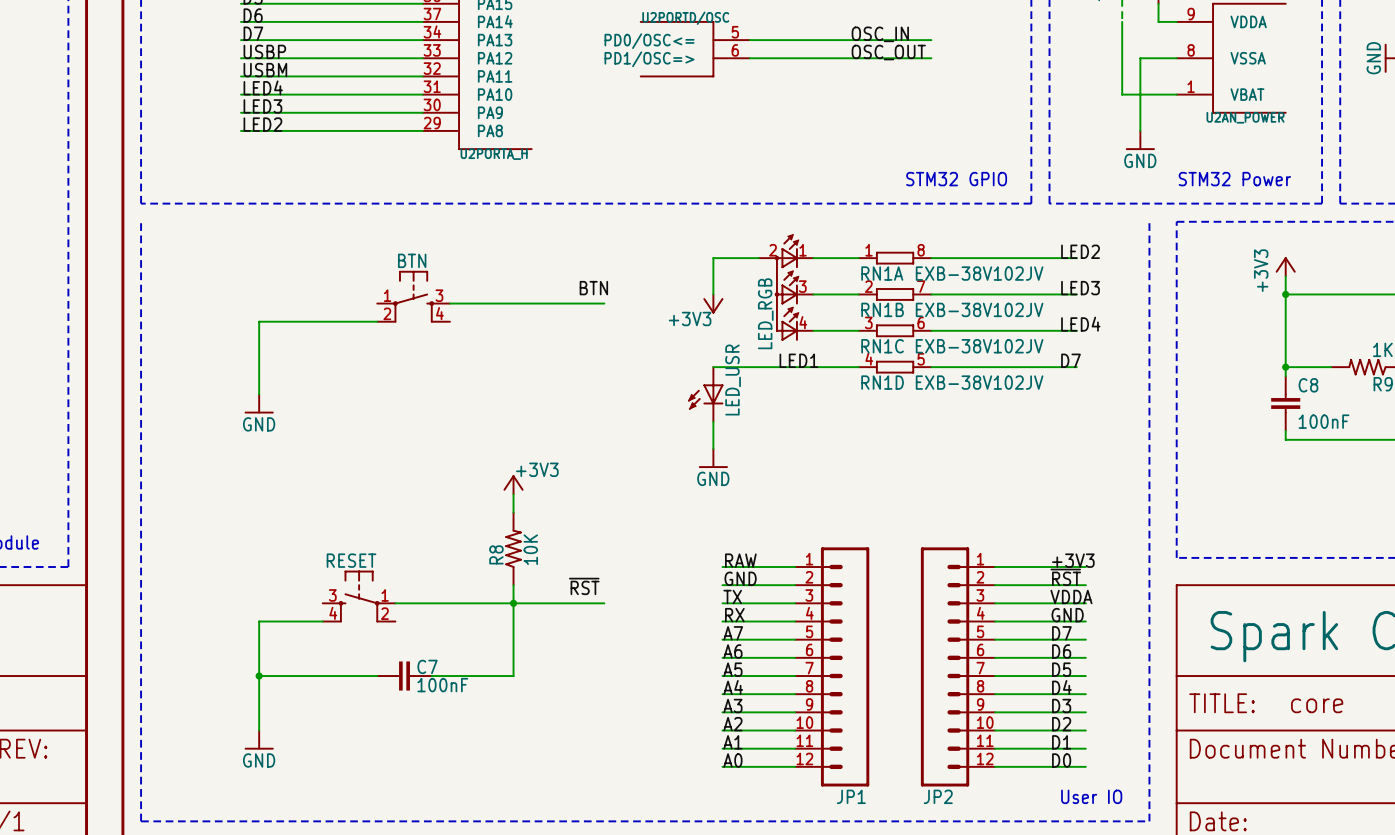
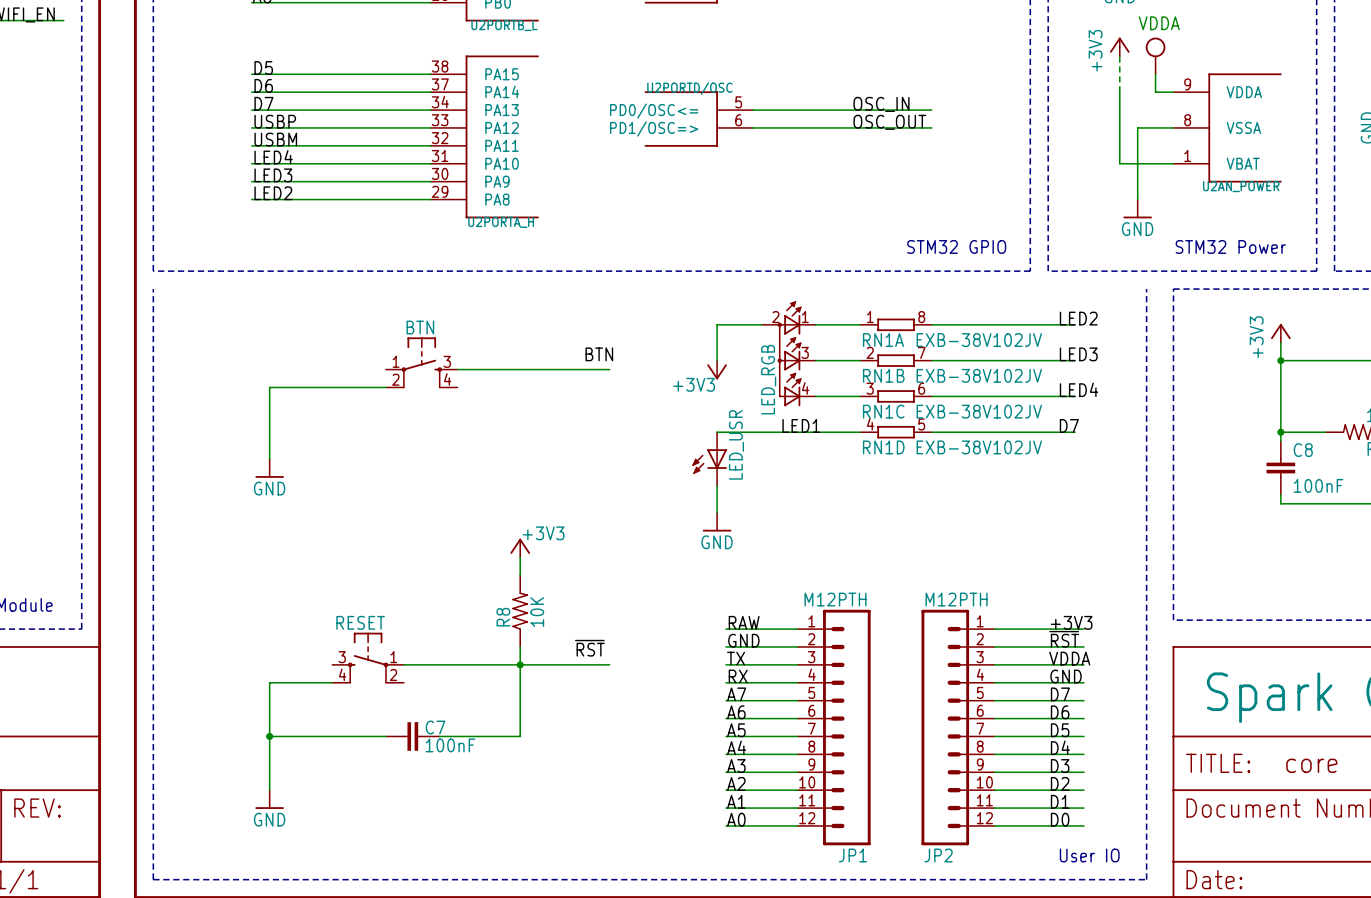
JP1 value: none -> M12PTH (835, 599)
JP2 value: none -> M12PTH (956, 599)

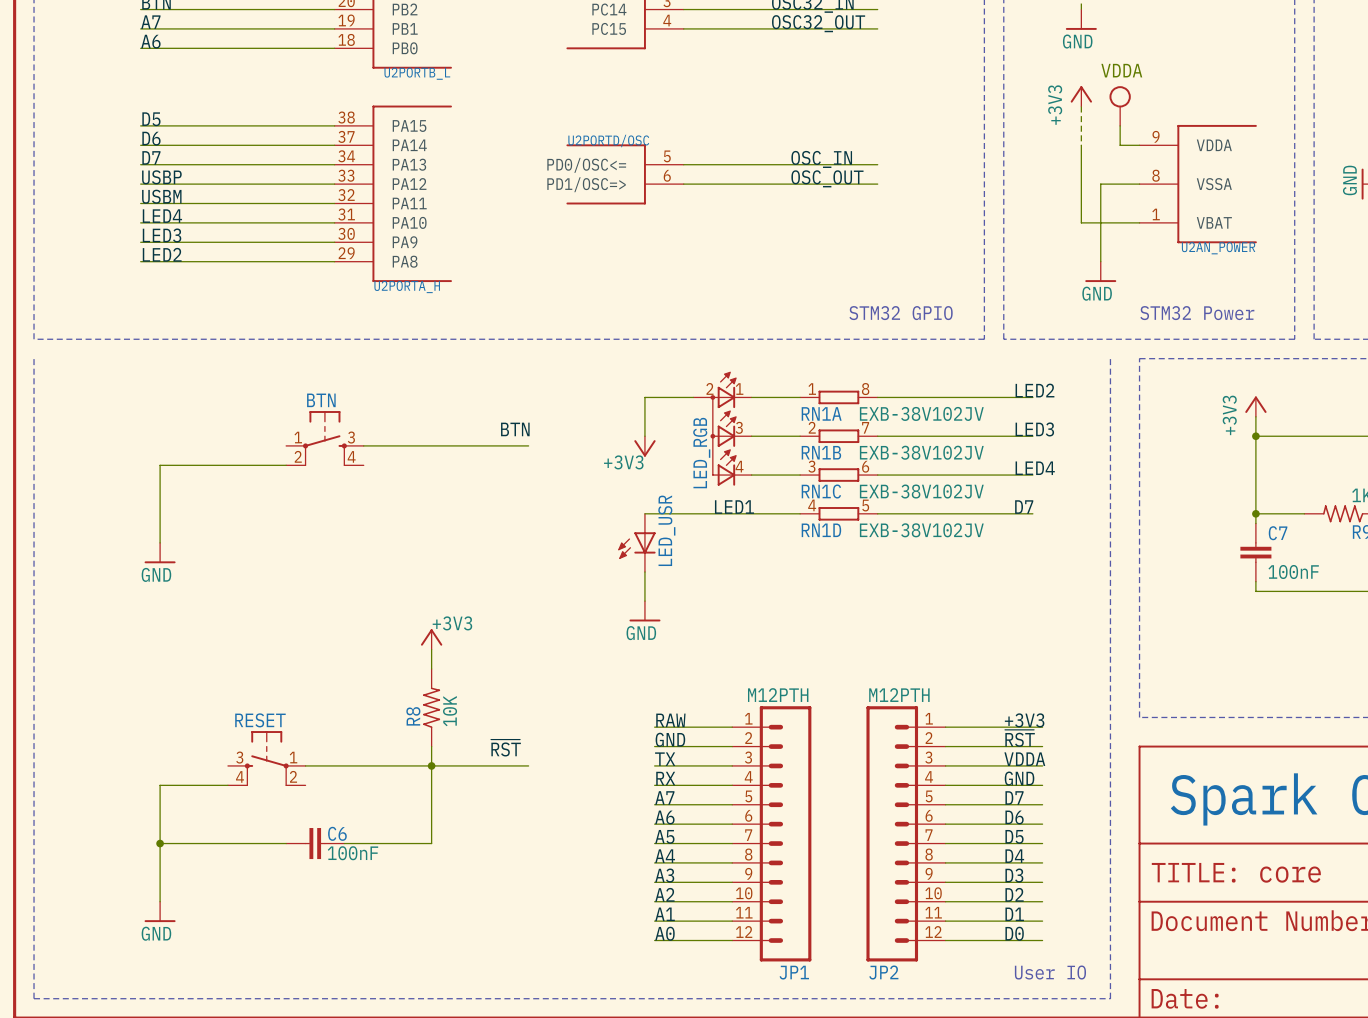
C8 name: C8 (1303, 450) -> C7 (1278, 533)
C7 name: C7 (435, 727) -> C6 (337, 833)

